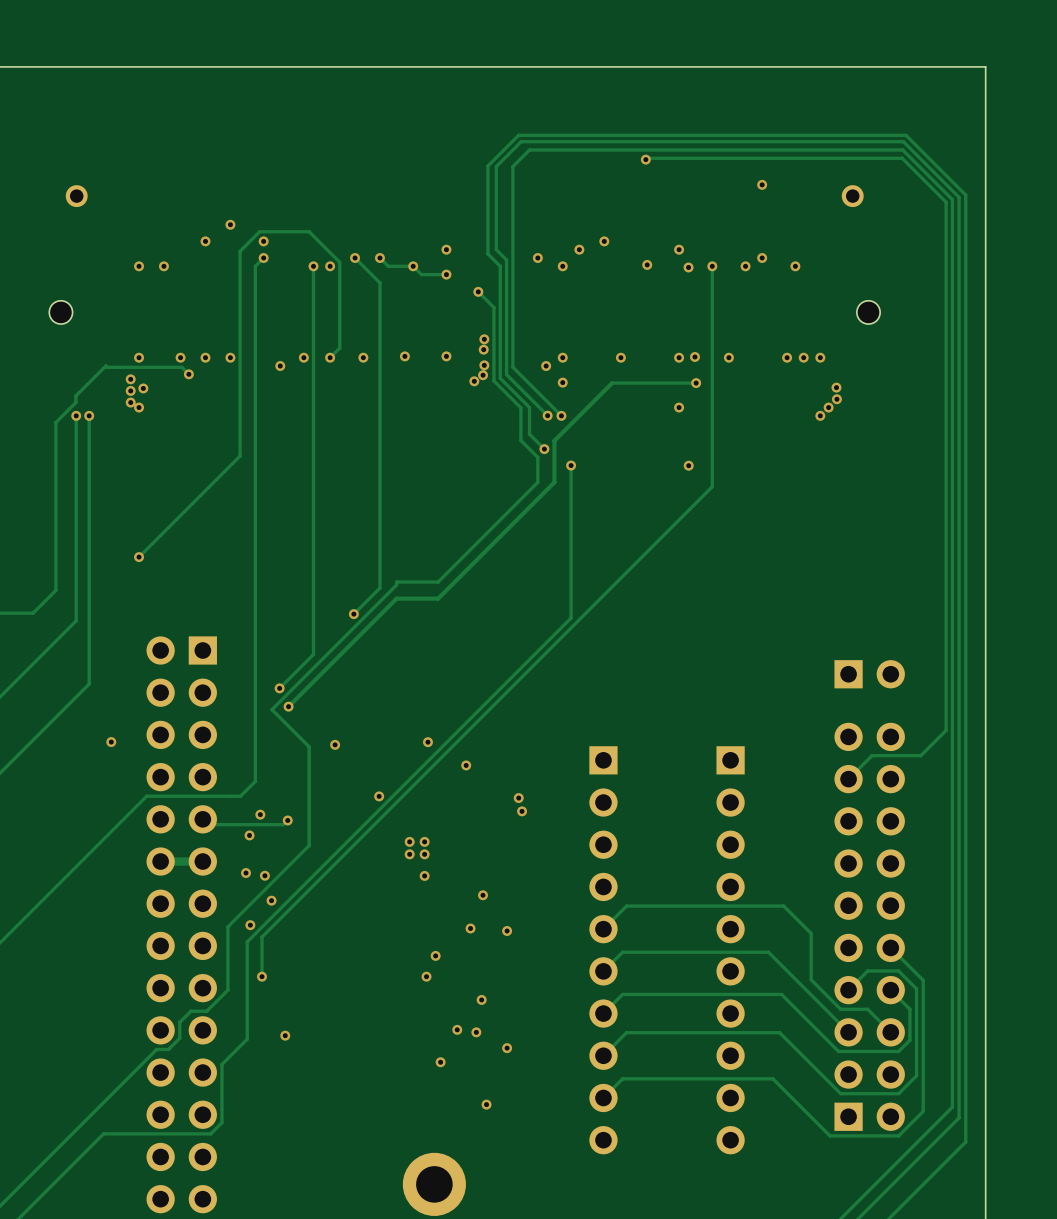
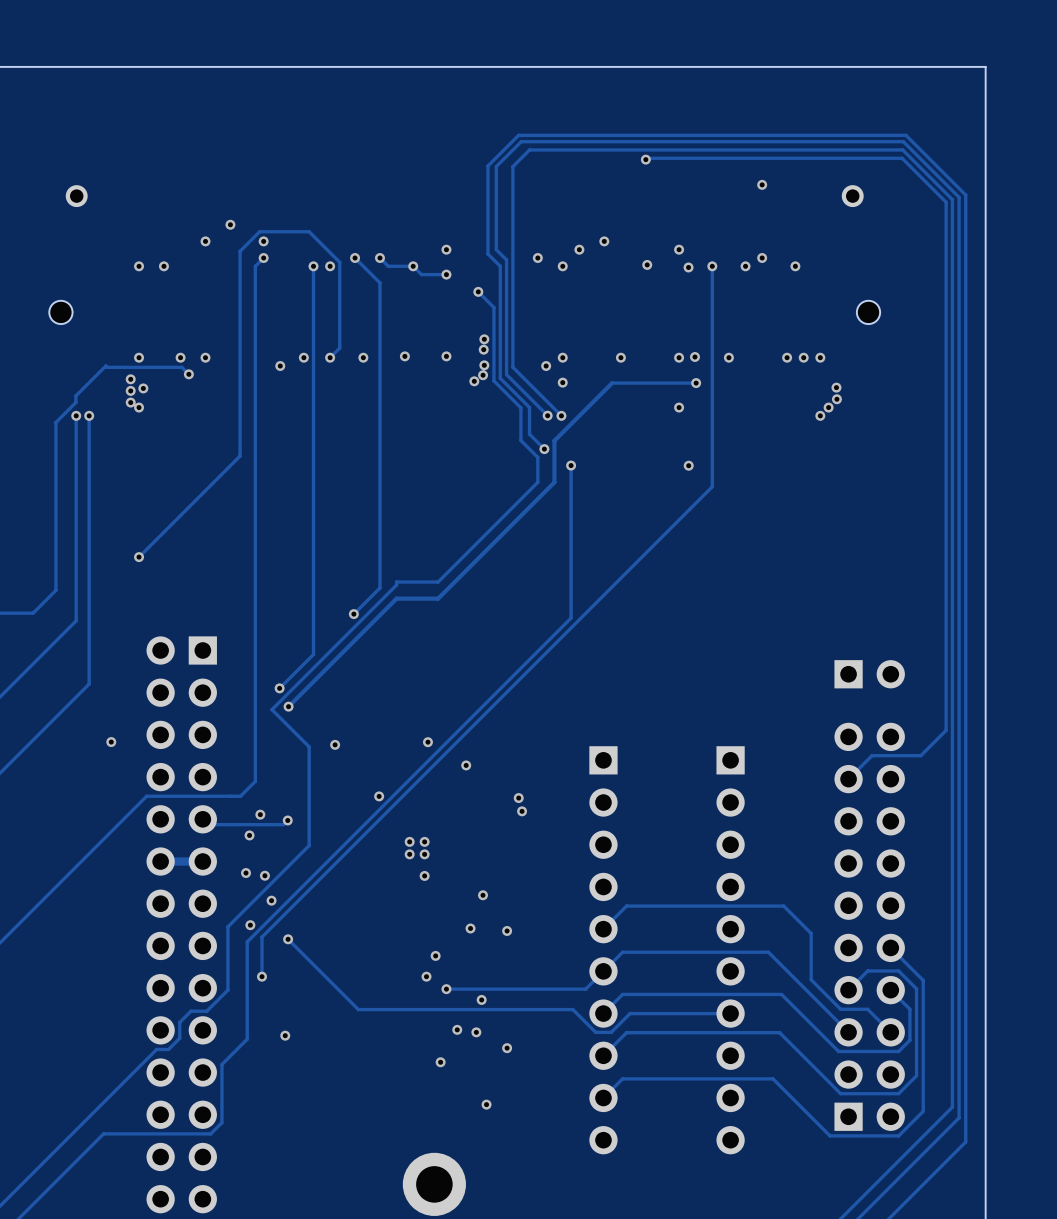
via: (230, 357) -> none
track: none -> (288, 939) (358, 1009) (572, 1009) (595, 1032) (611, 1032) (630, 1013) (730, 1013)
via: none -> (288, 939)
track: none -> (603, 971) (585, 989) (446, 989)
via: none -> (446, 989)

